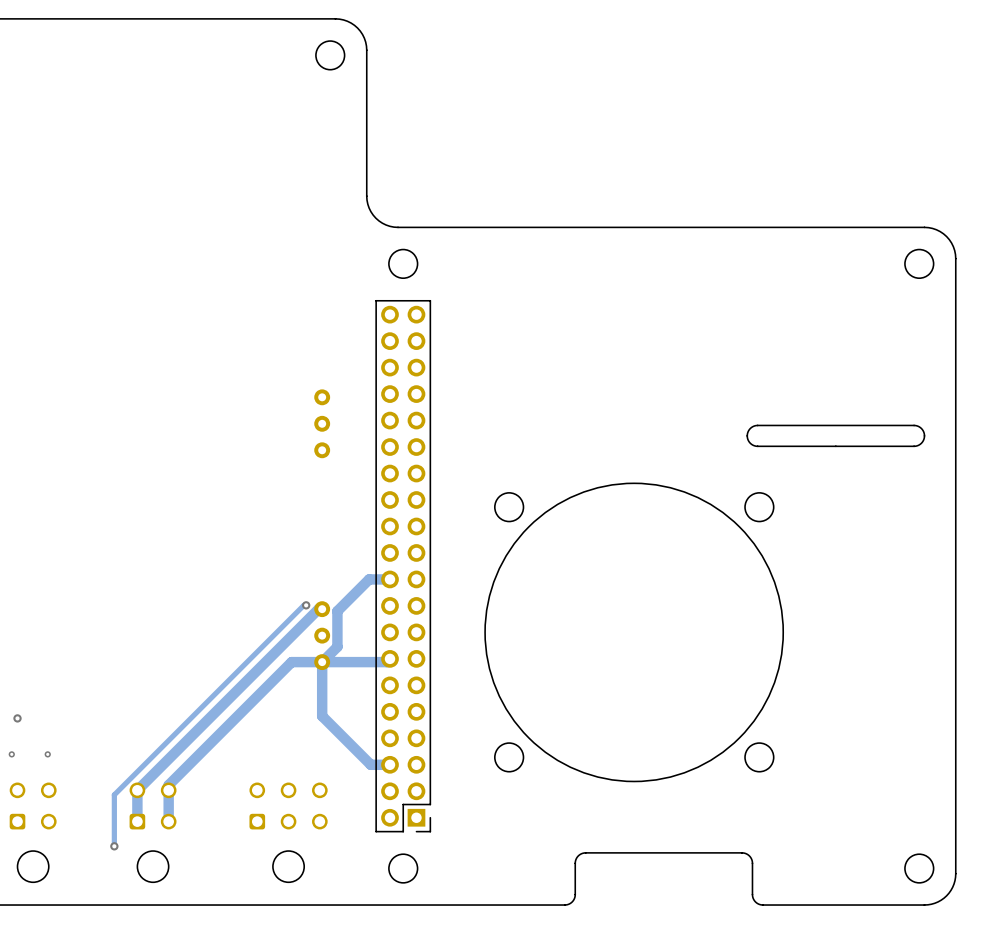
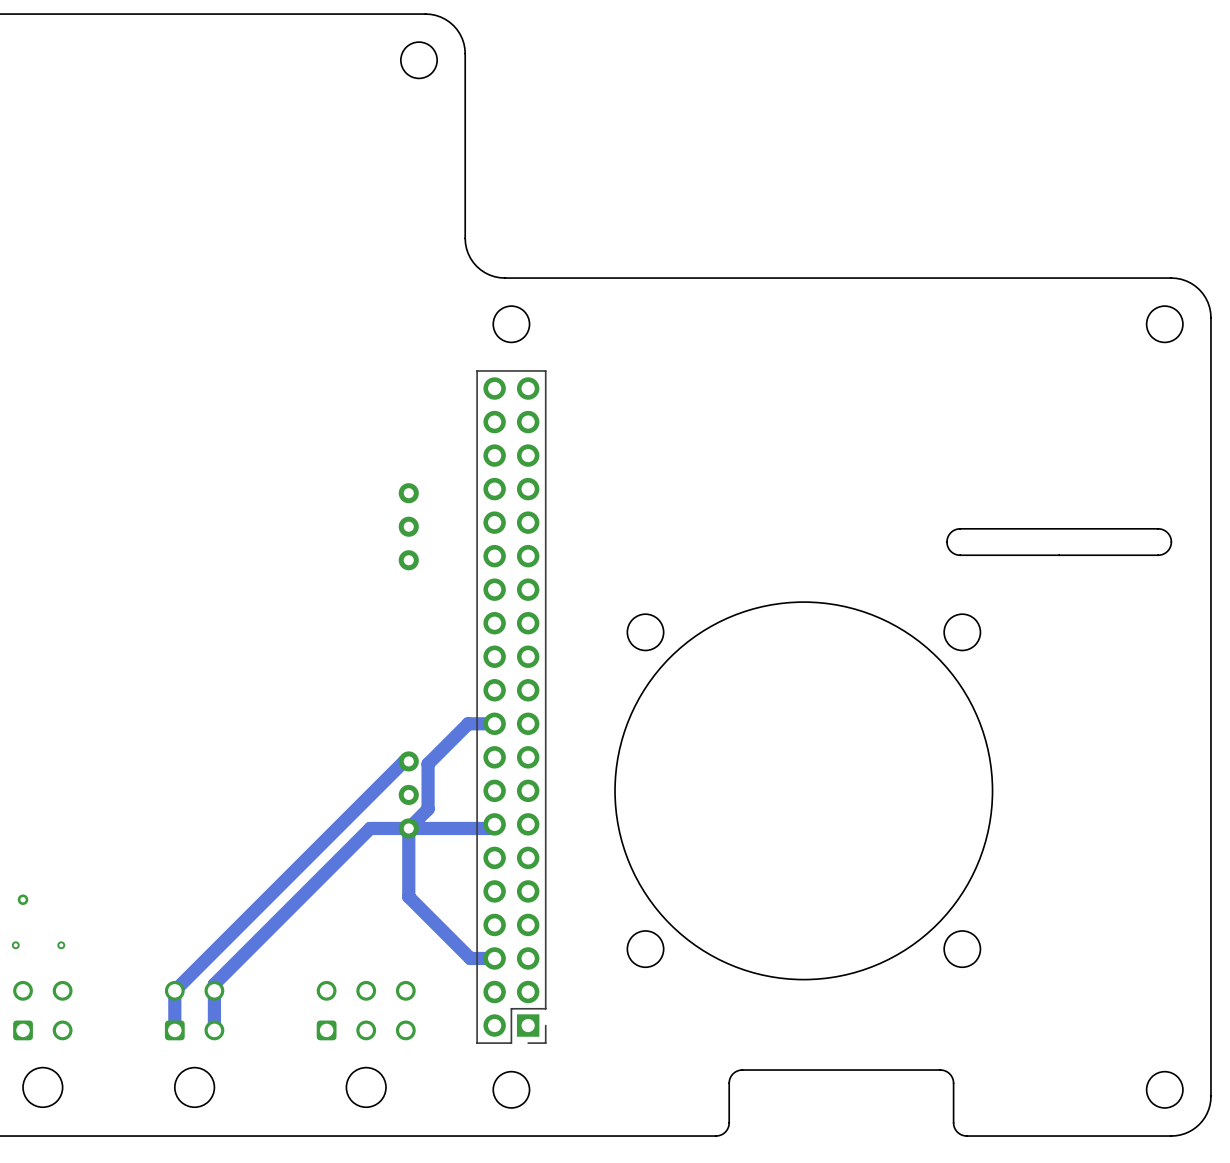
track: (306, 605) (303, 605) (114, 794) (114, 846) -> none
via: (306, 605) -> none
via: (114, 846) -> none

